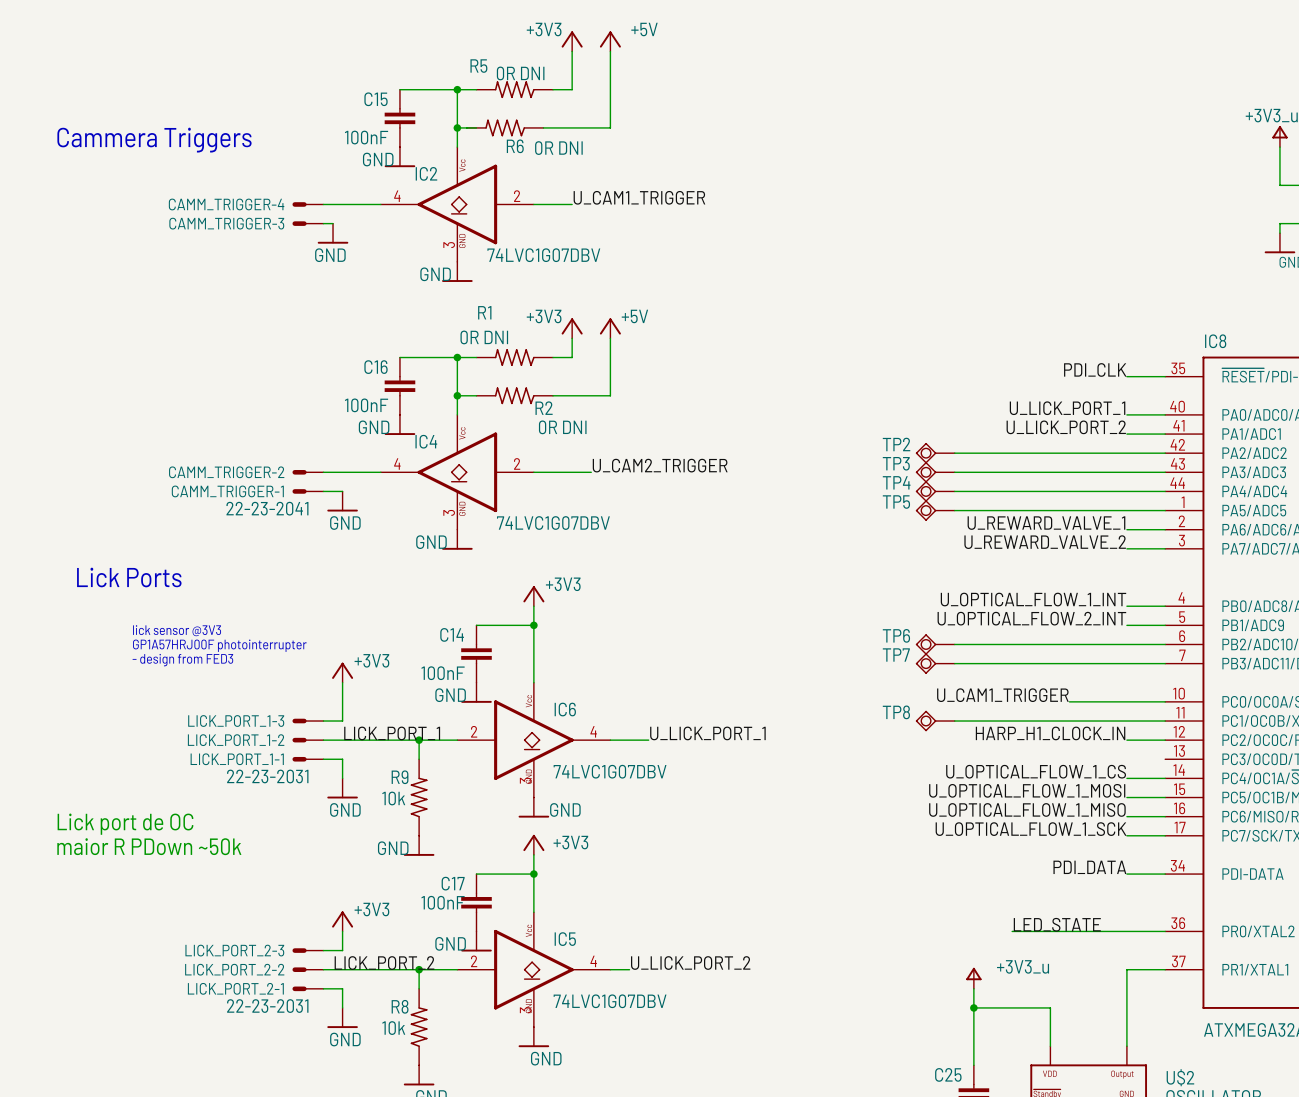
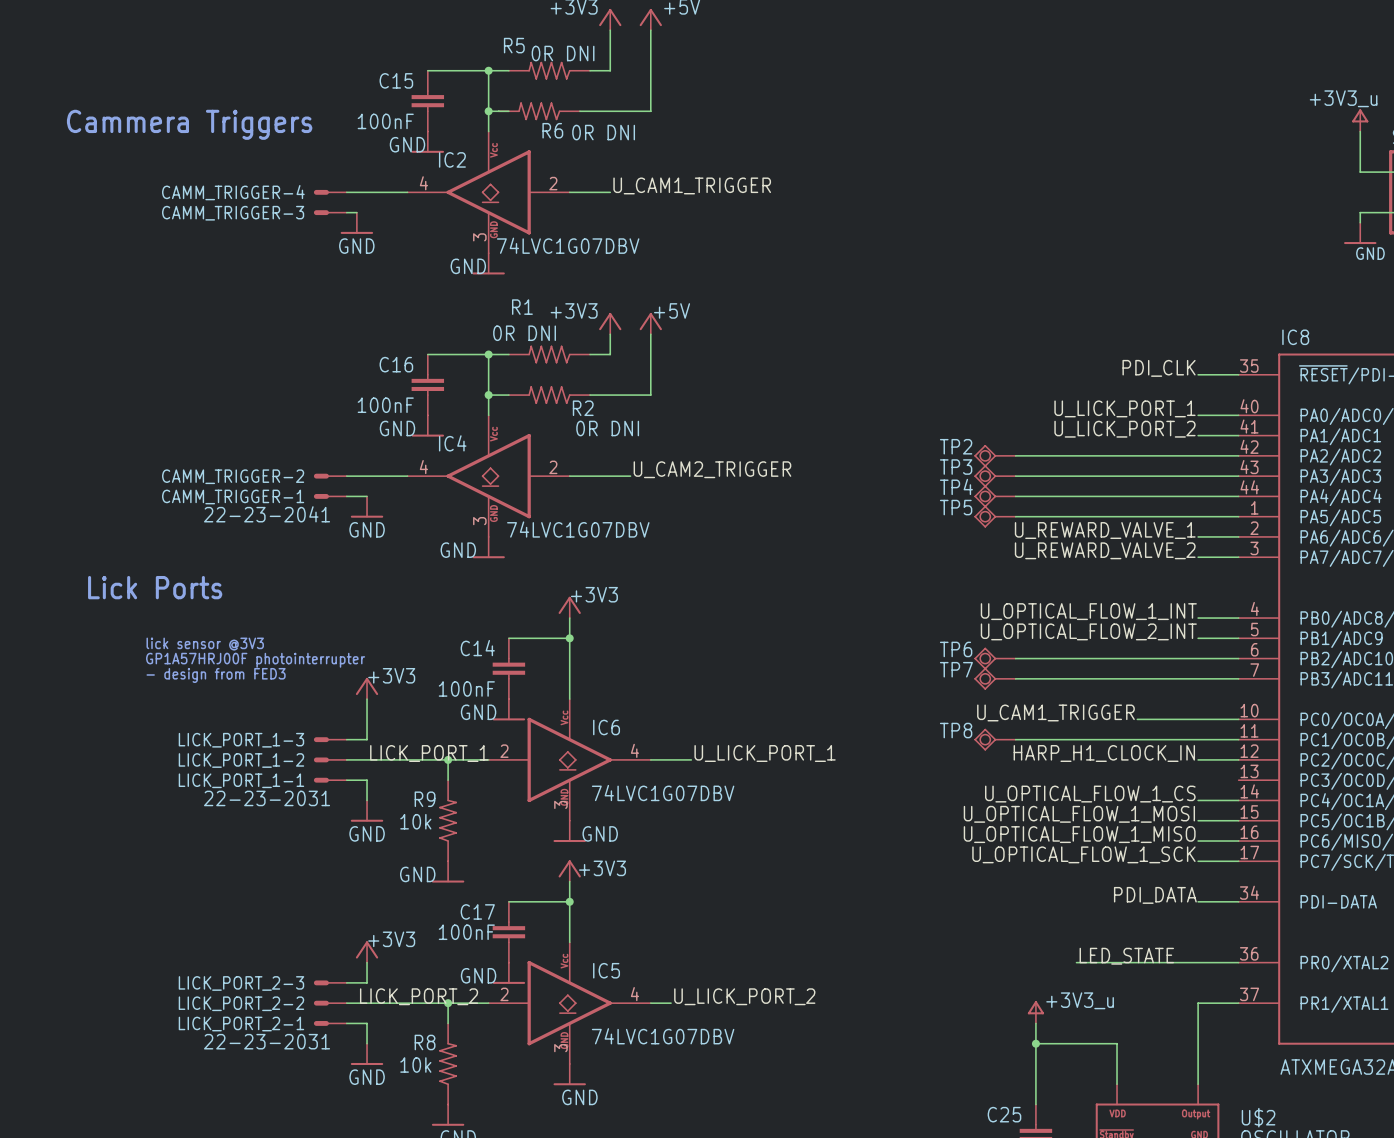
text: Lick port de OC (125, 824) -> none
text: maior R PDown ~50k (149, 846) -> none

